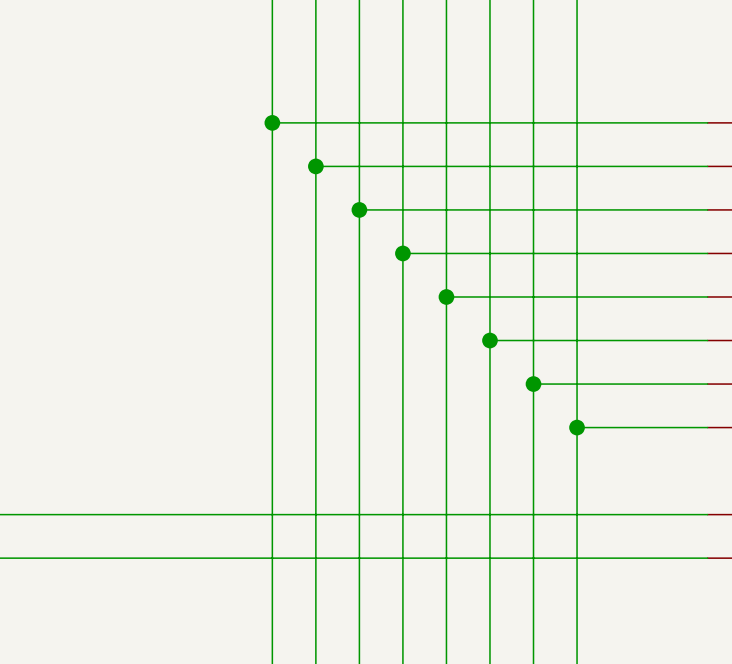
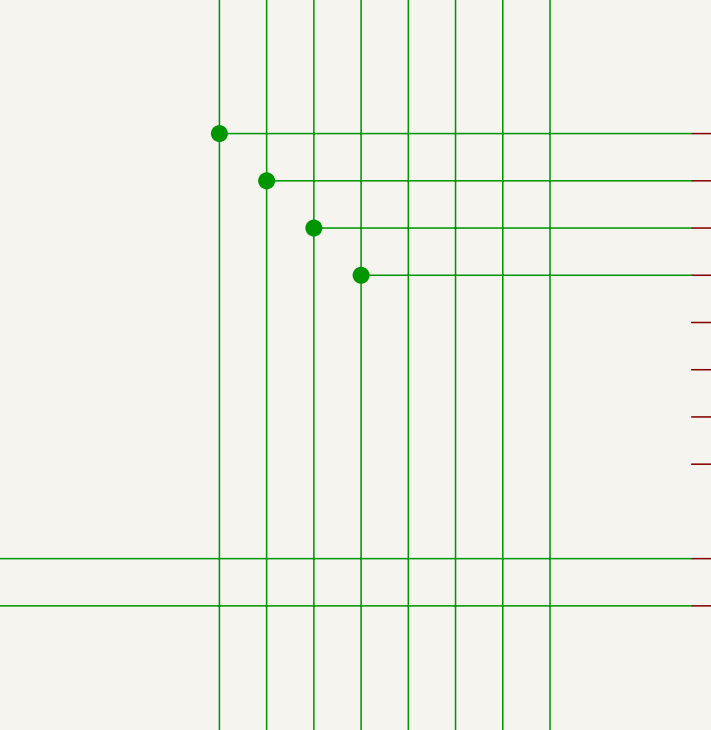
wire: (446, 296) (707, 296) -> none
junction: (446, 296) -> none
wire: (489, 340) (707, 340) -> none
junction: (489, 340) -> none
wire: (533, 384) (707, 384) -> none
junction: (533, 384) -> none
wire: (577, 427) (707, 427) -> none
junction: (577, 427) -> none

